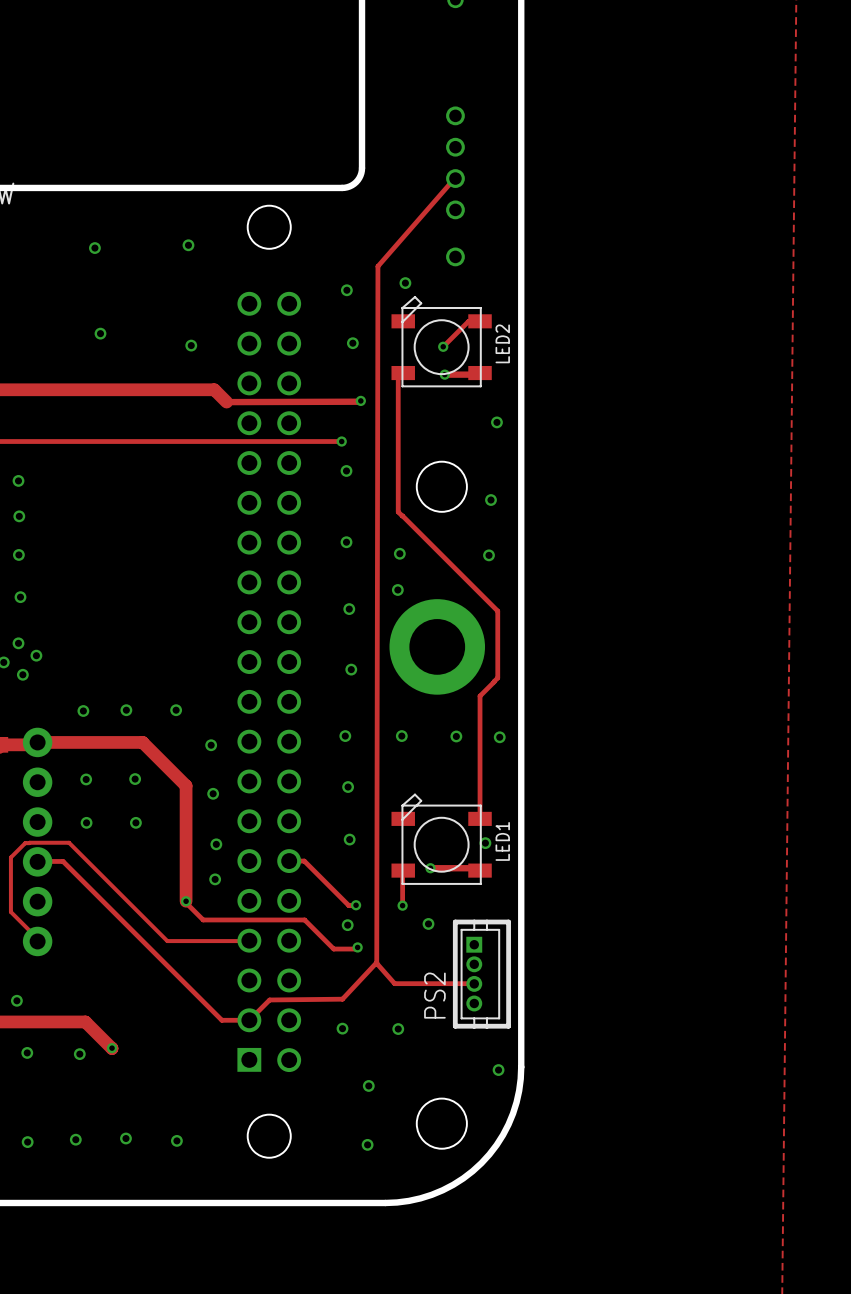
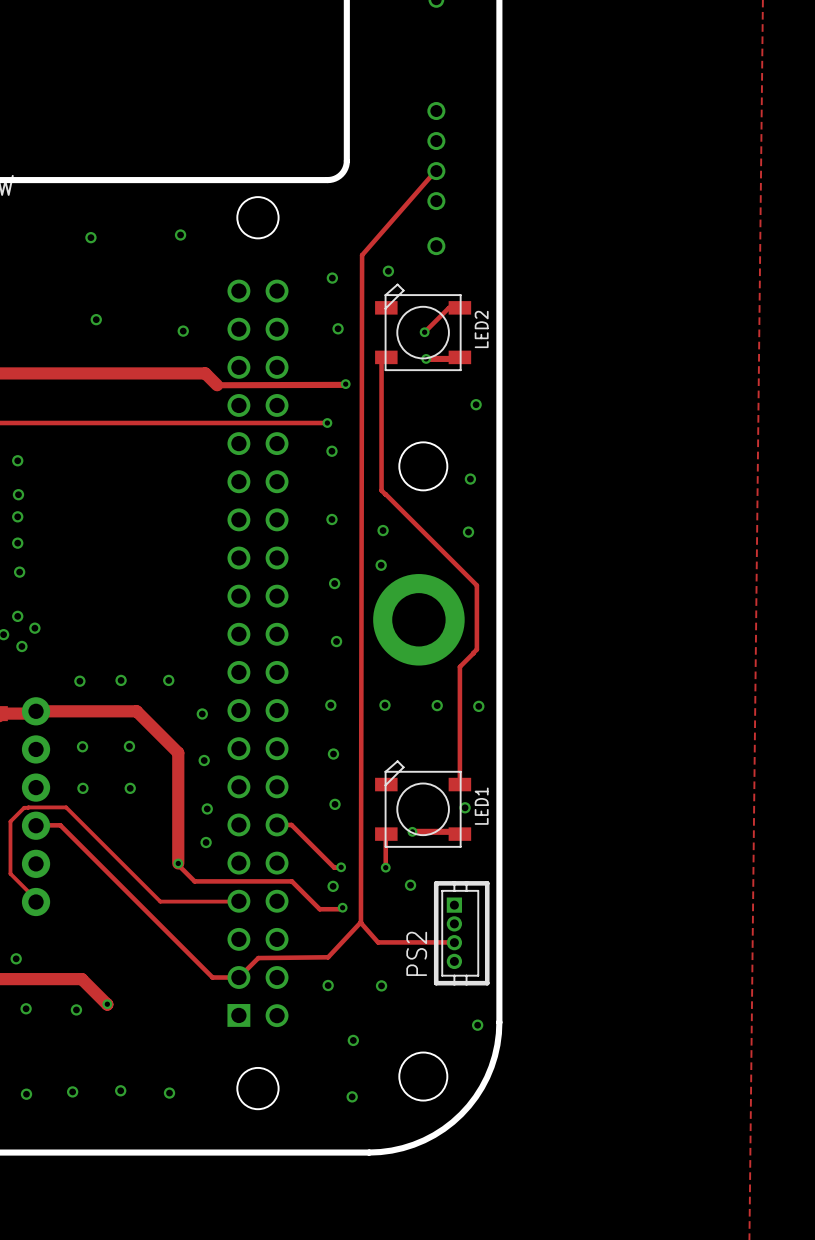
via: none -> (17, 516)
via: (18, 554) -> none
via: none -> (17, 543)

